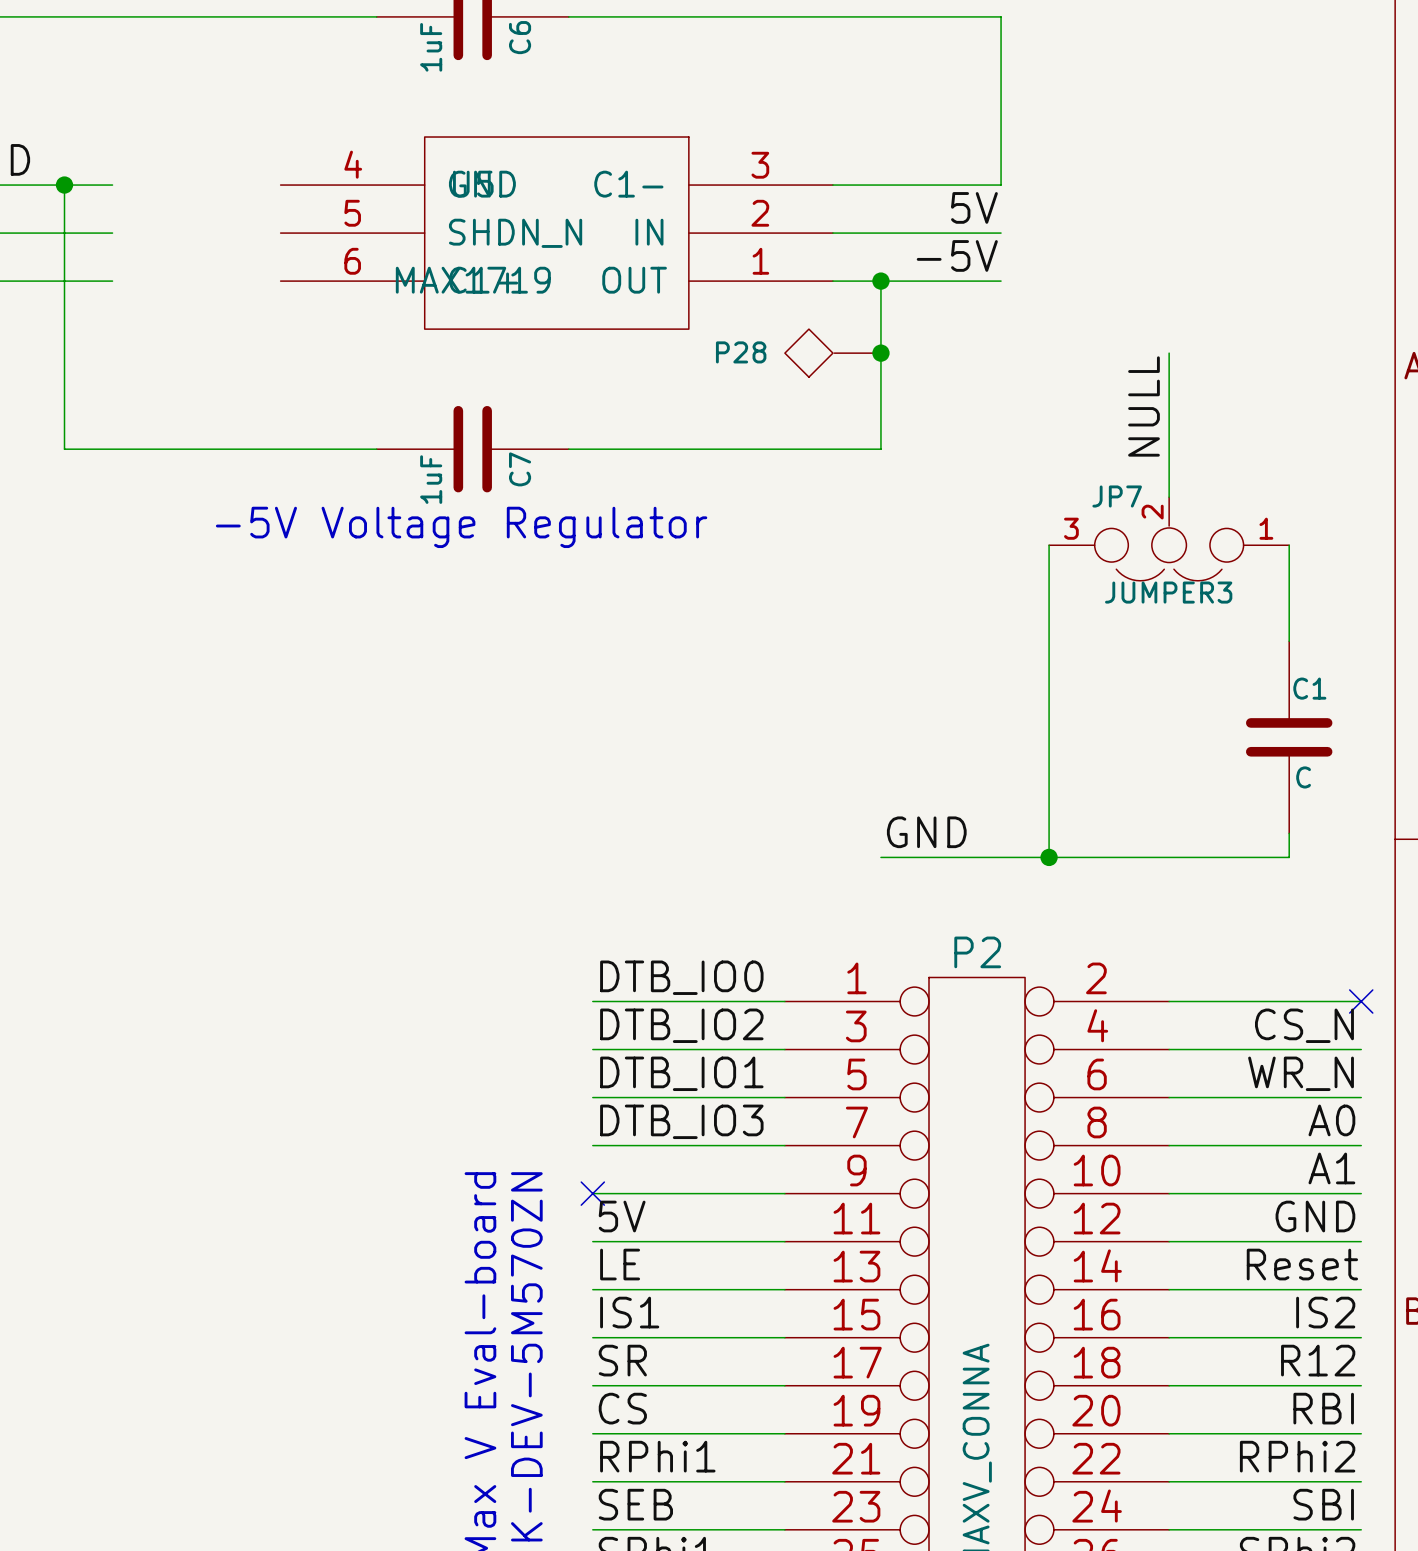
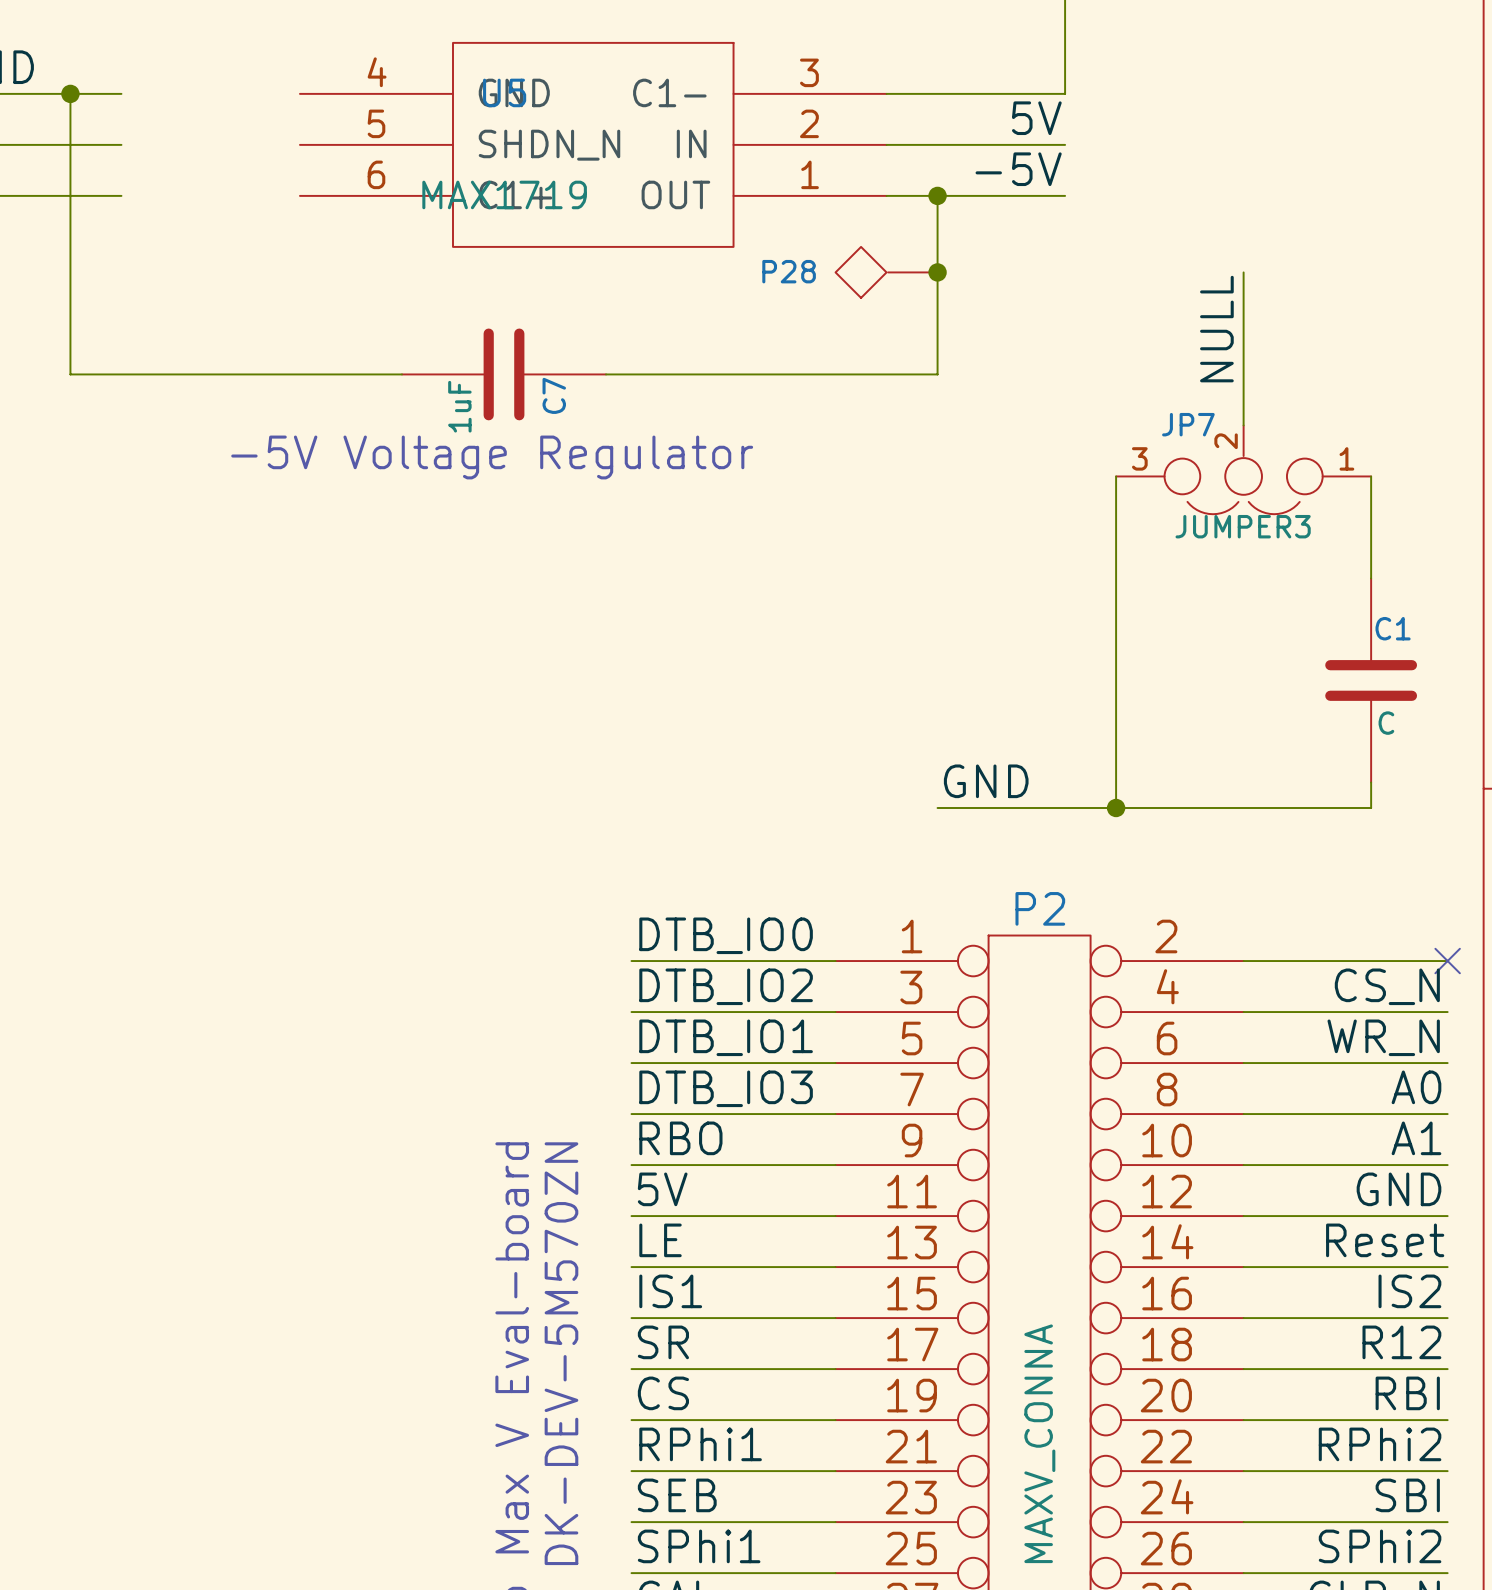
label: none -> RBO (680, 1138)
no-connect mark: (592, 1193) -> none

